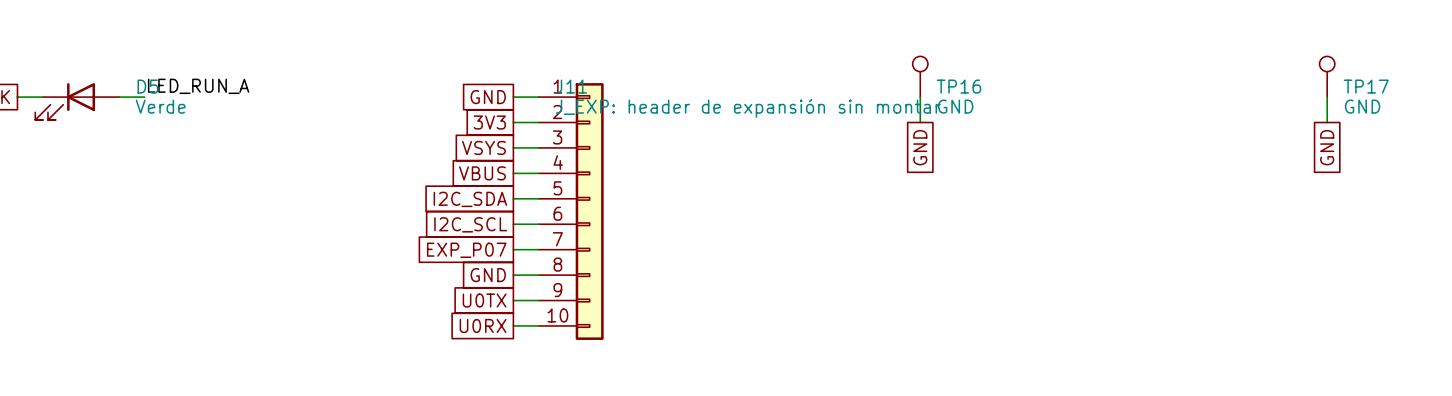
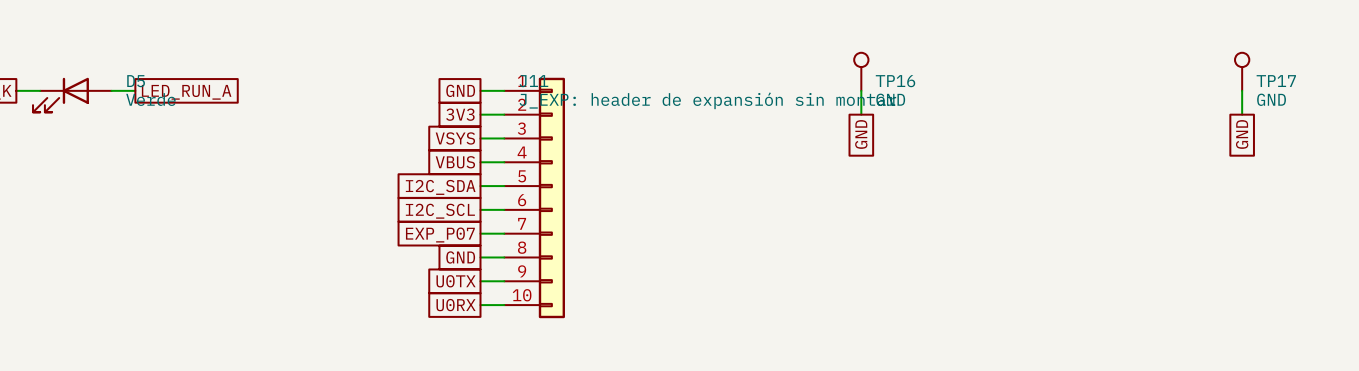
label: LED_RUN_A (198, 86) -> none
global label: none -> LED_RUN_A (186, 92)

